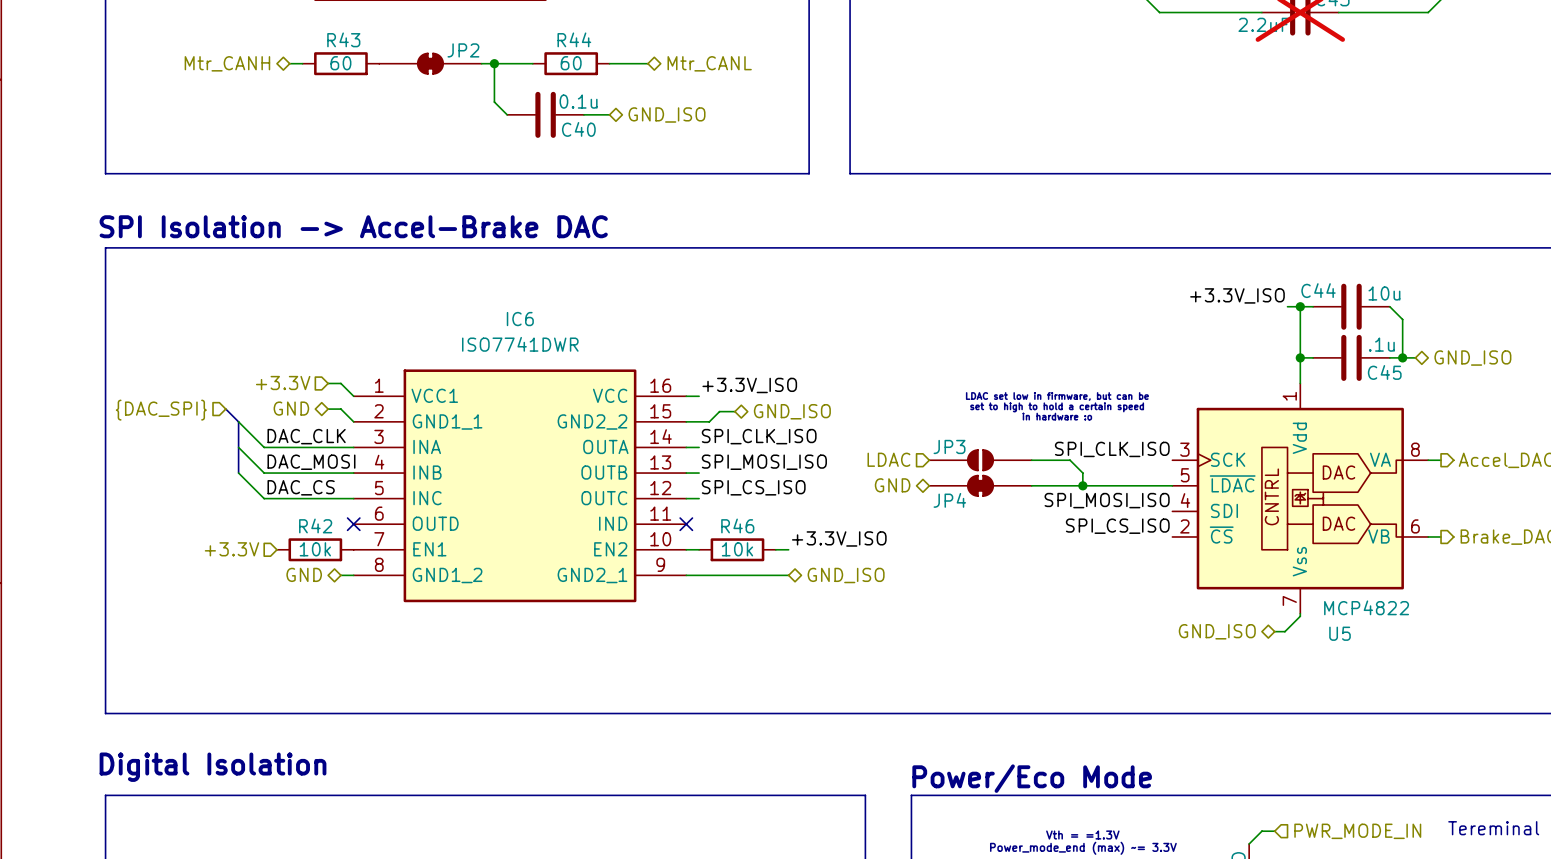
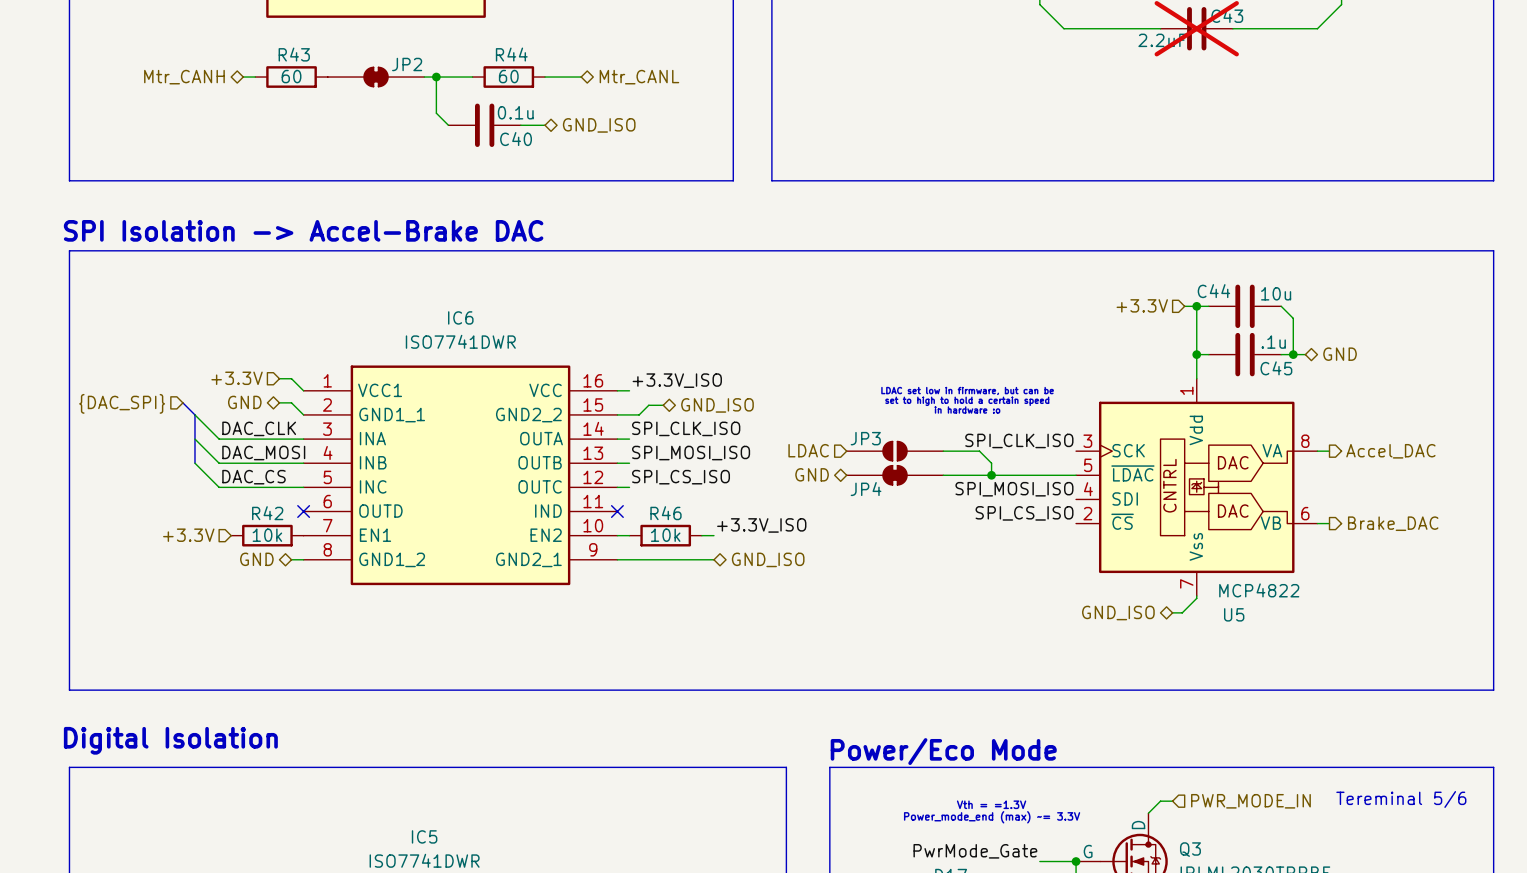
label: +3.3V_ISO (1237, 295) -> none
hierarchical label: none -> +3.3V (1142, 305)
hierarchical label: GND_ISO (1472, 358) -> GND (1340, 354)

